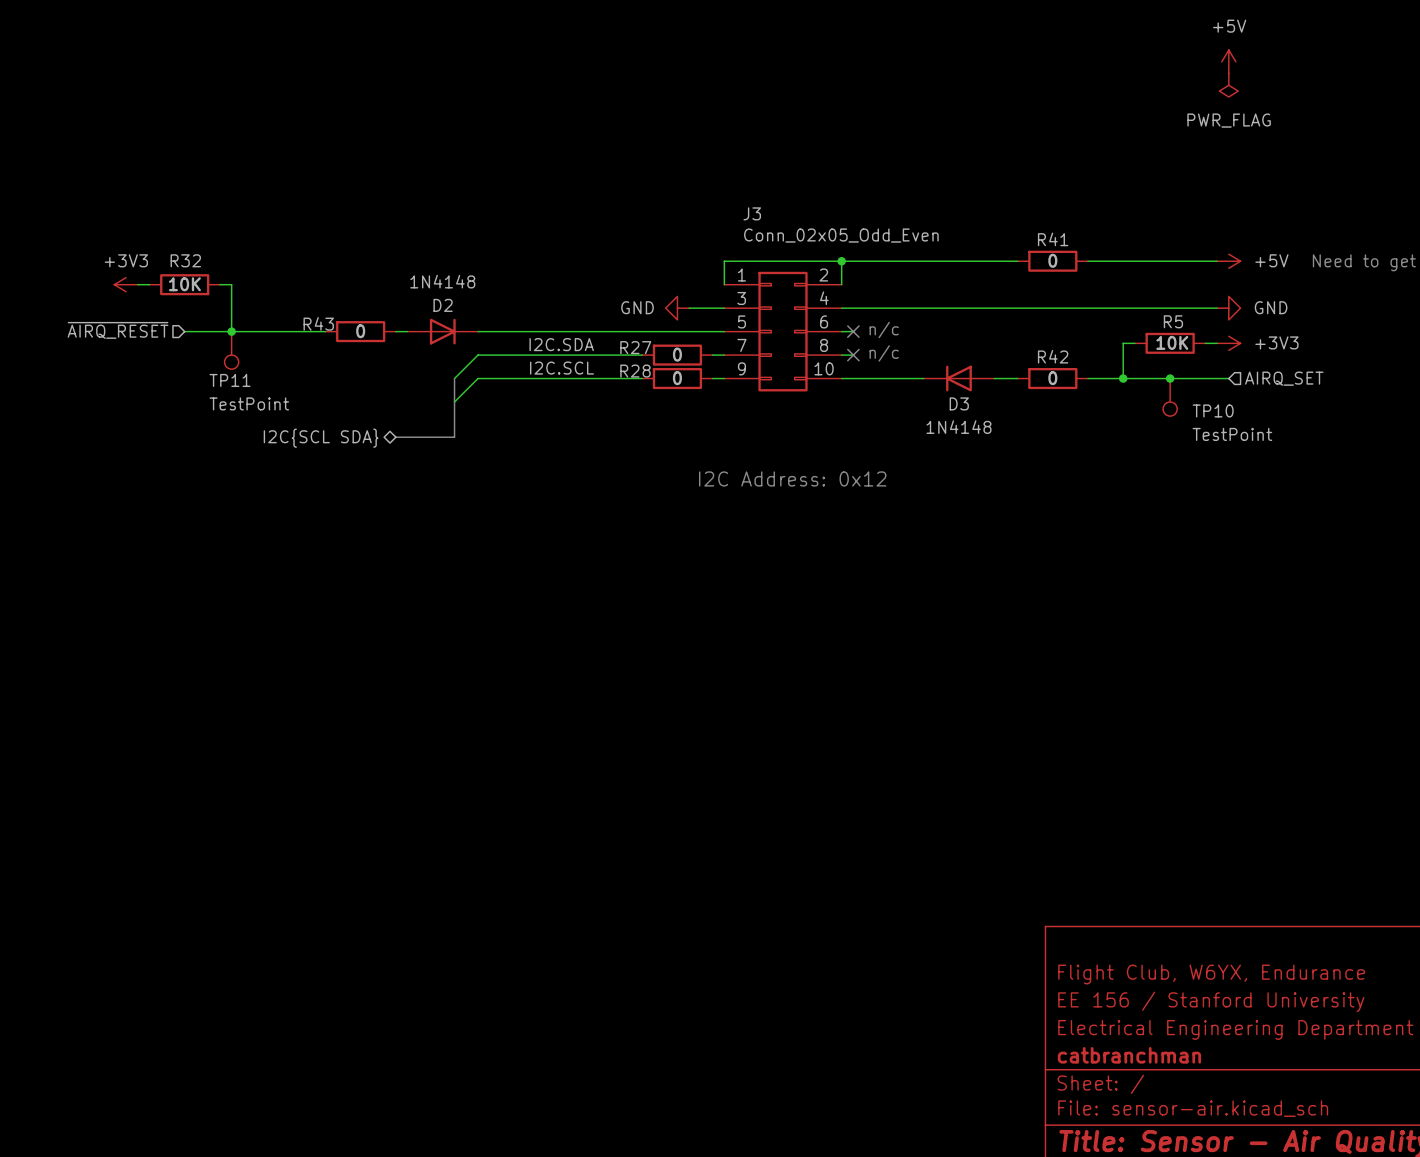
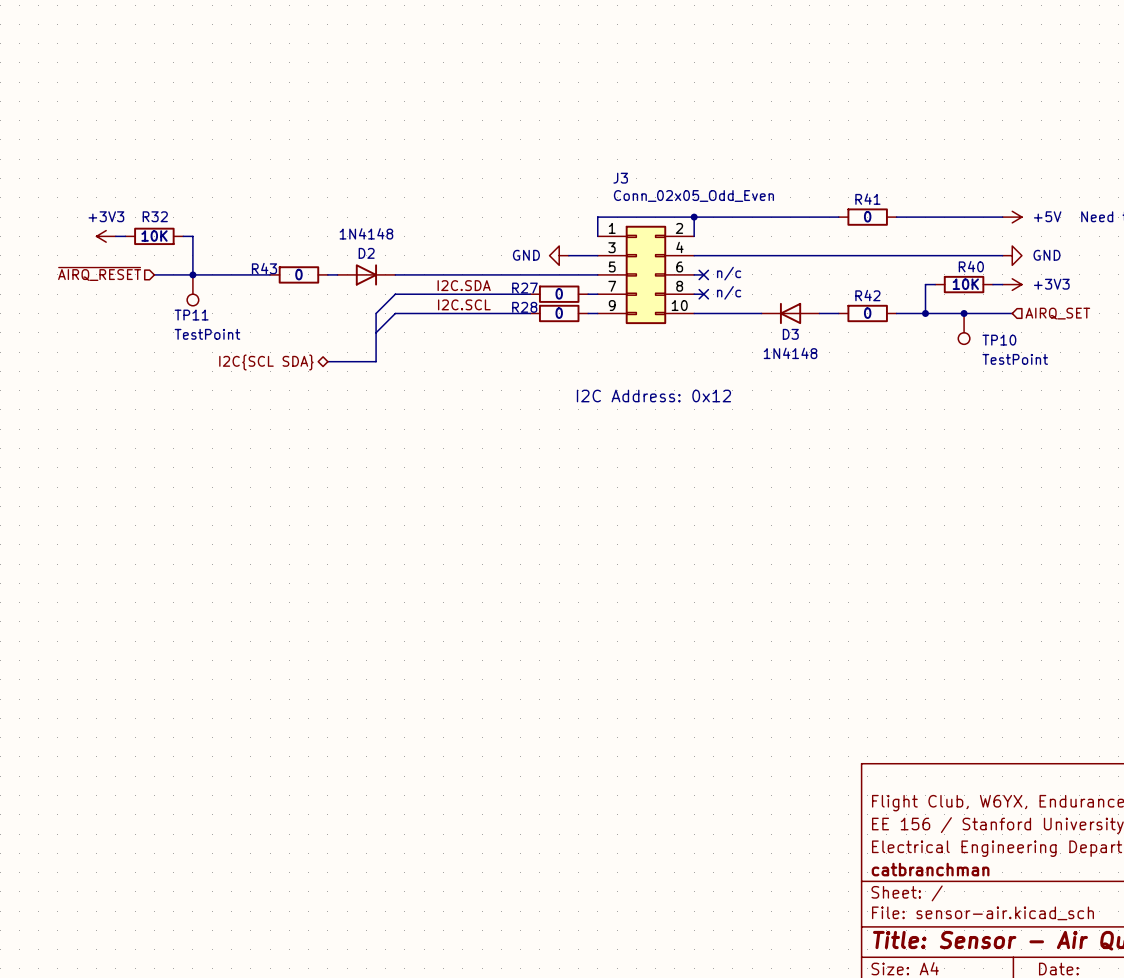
power symbol: +5V (1228, 61) -> none
power symbol: PWR_FLAG (1228, 85) -> none
R5 name: R5 (1173, 321) -> R40 (971, 266)

